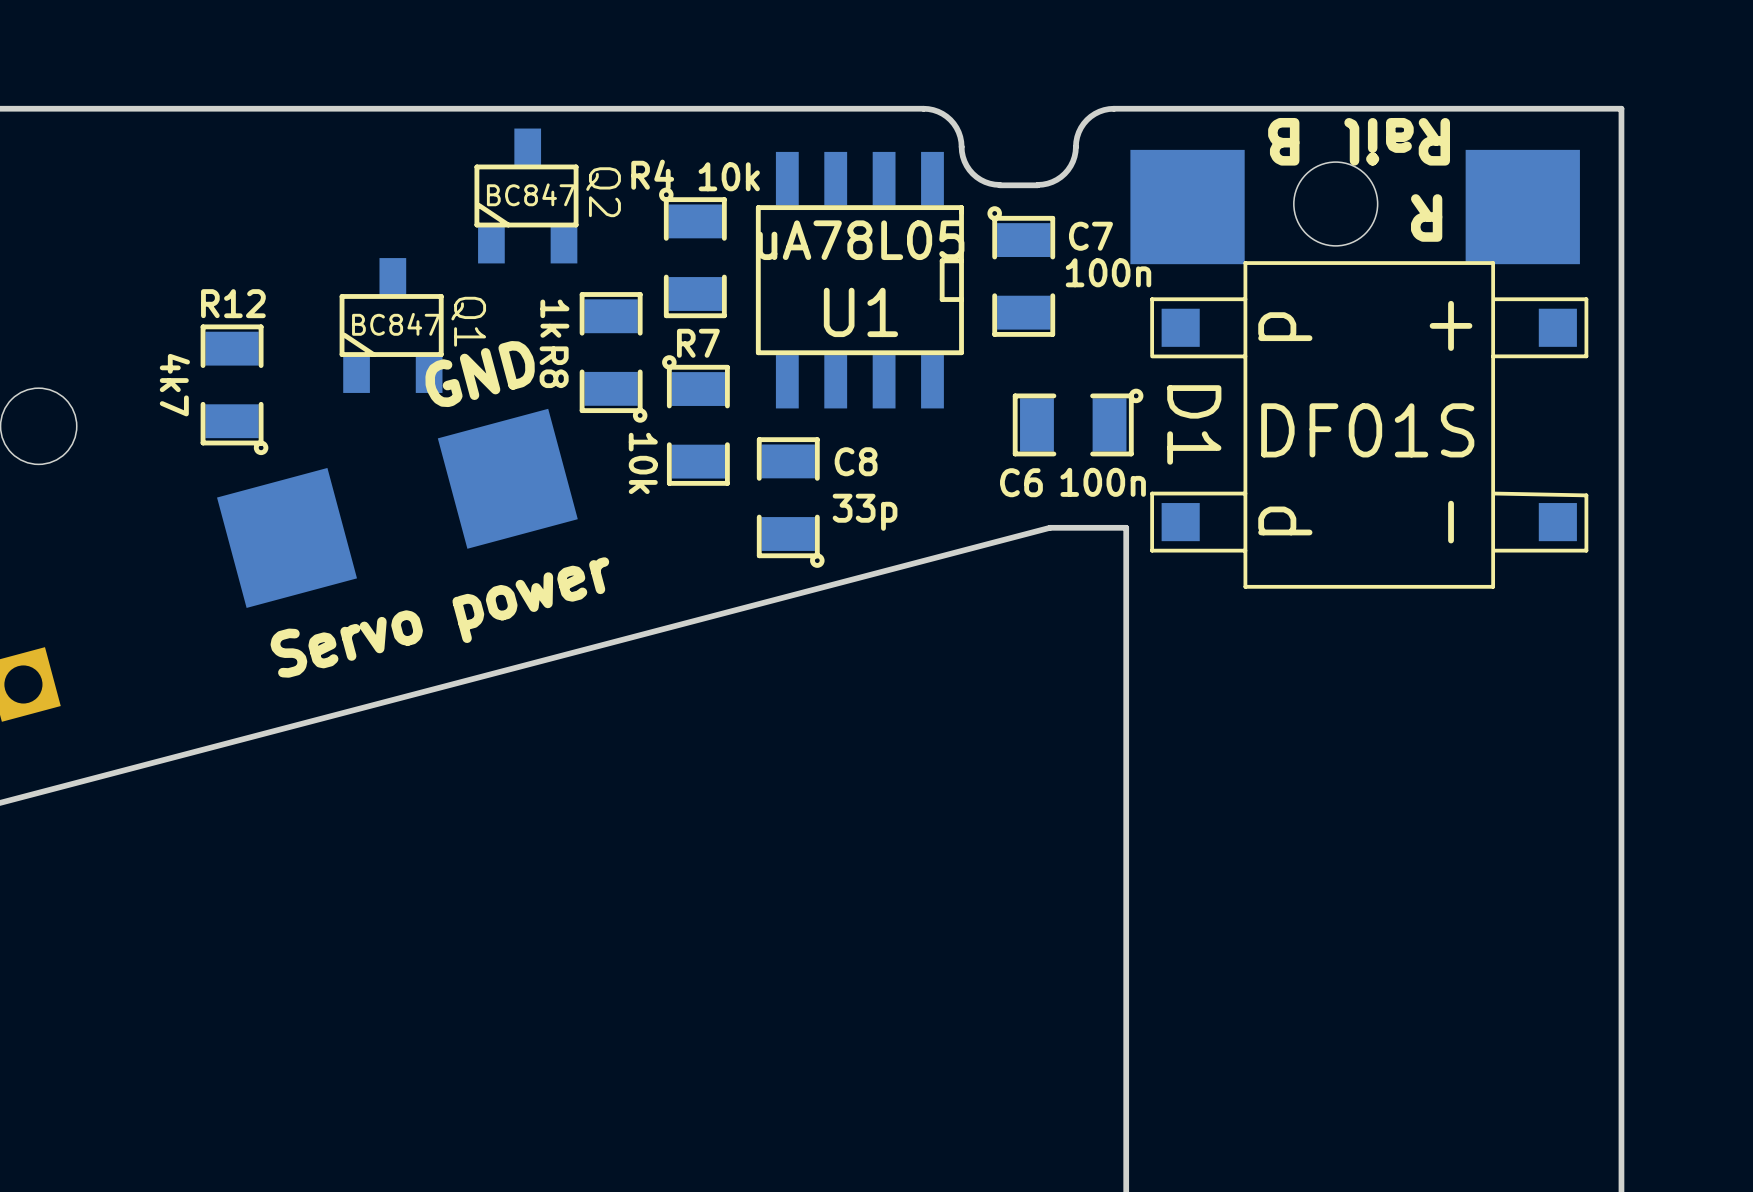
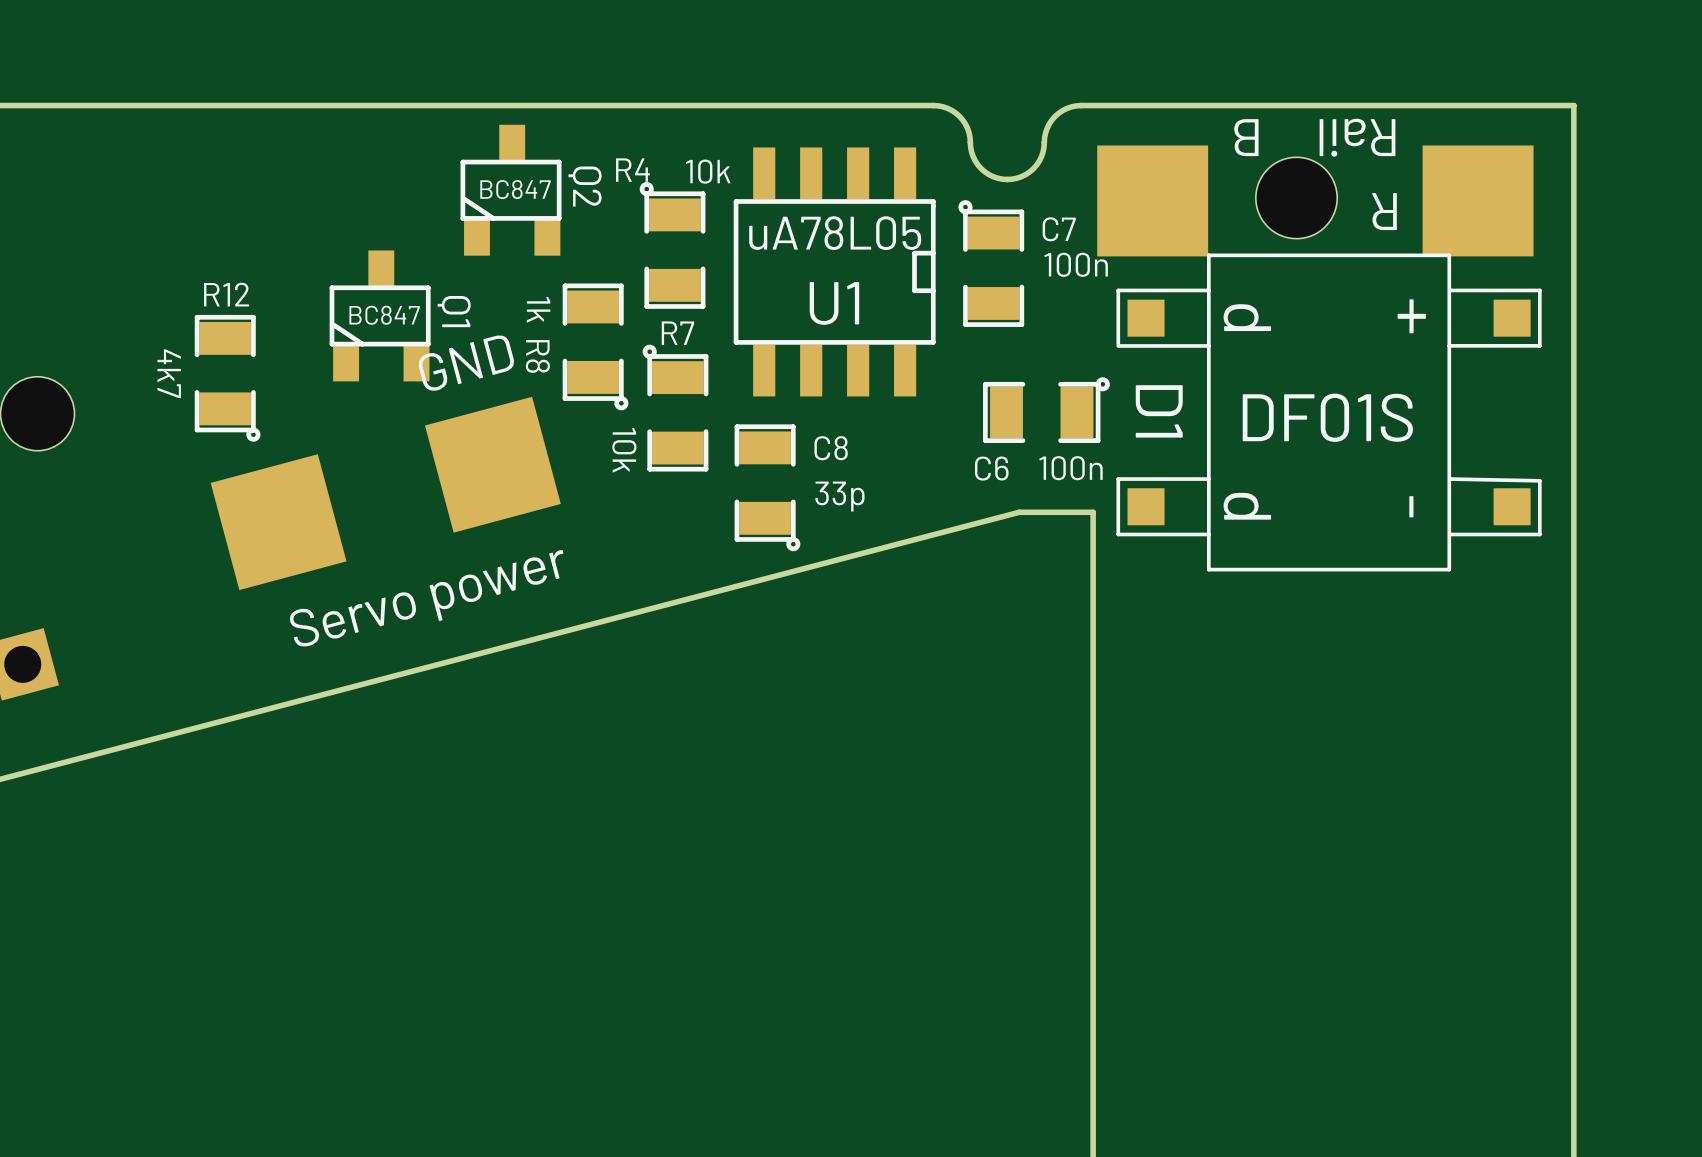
board edge: (923, 108) (938, 111) (950, 119) (958, 132) (962, 156) (969, 170) (985, 182) (999, 184) -> (896, 105) (938, 105) (951, 110) (959, 116) (967, 128) (971, 152) (978, 165) (993, 176) (1007, 179)
board edge: (1037, 185) (999, 185) -> none

